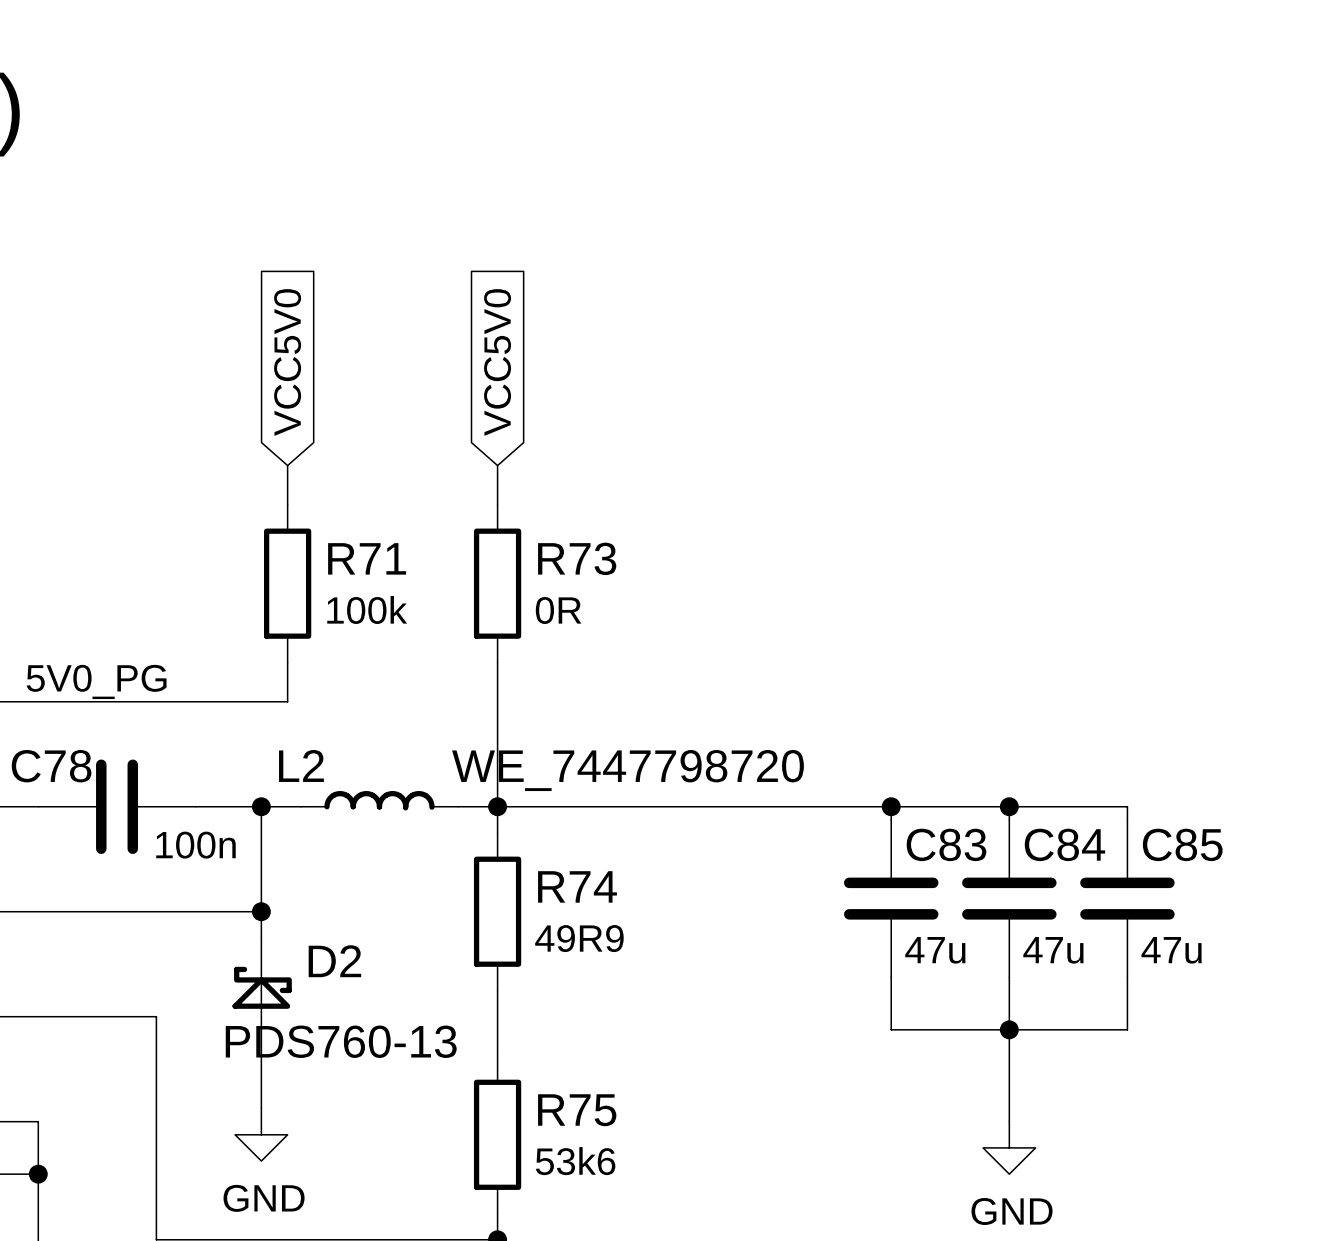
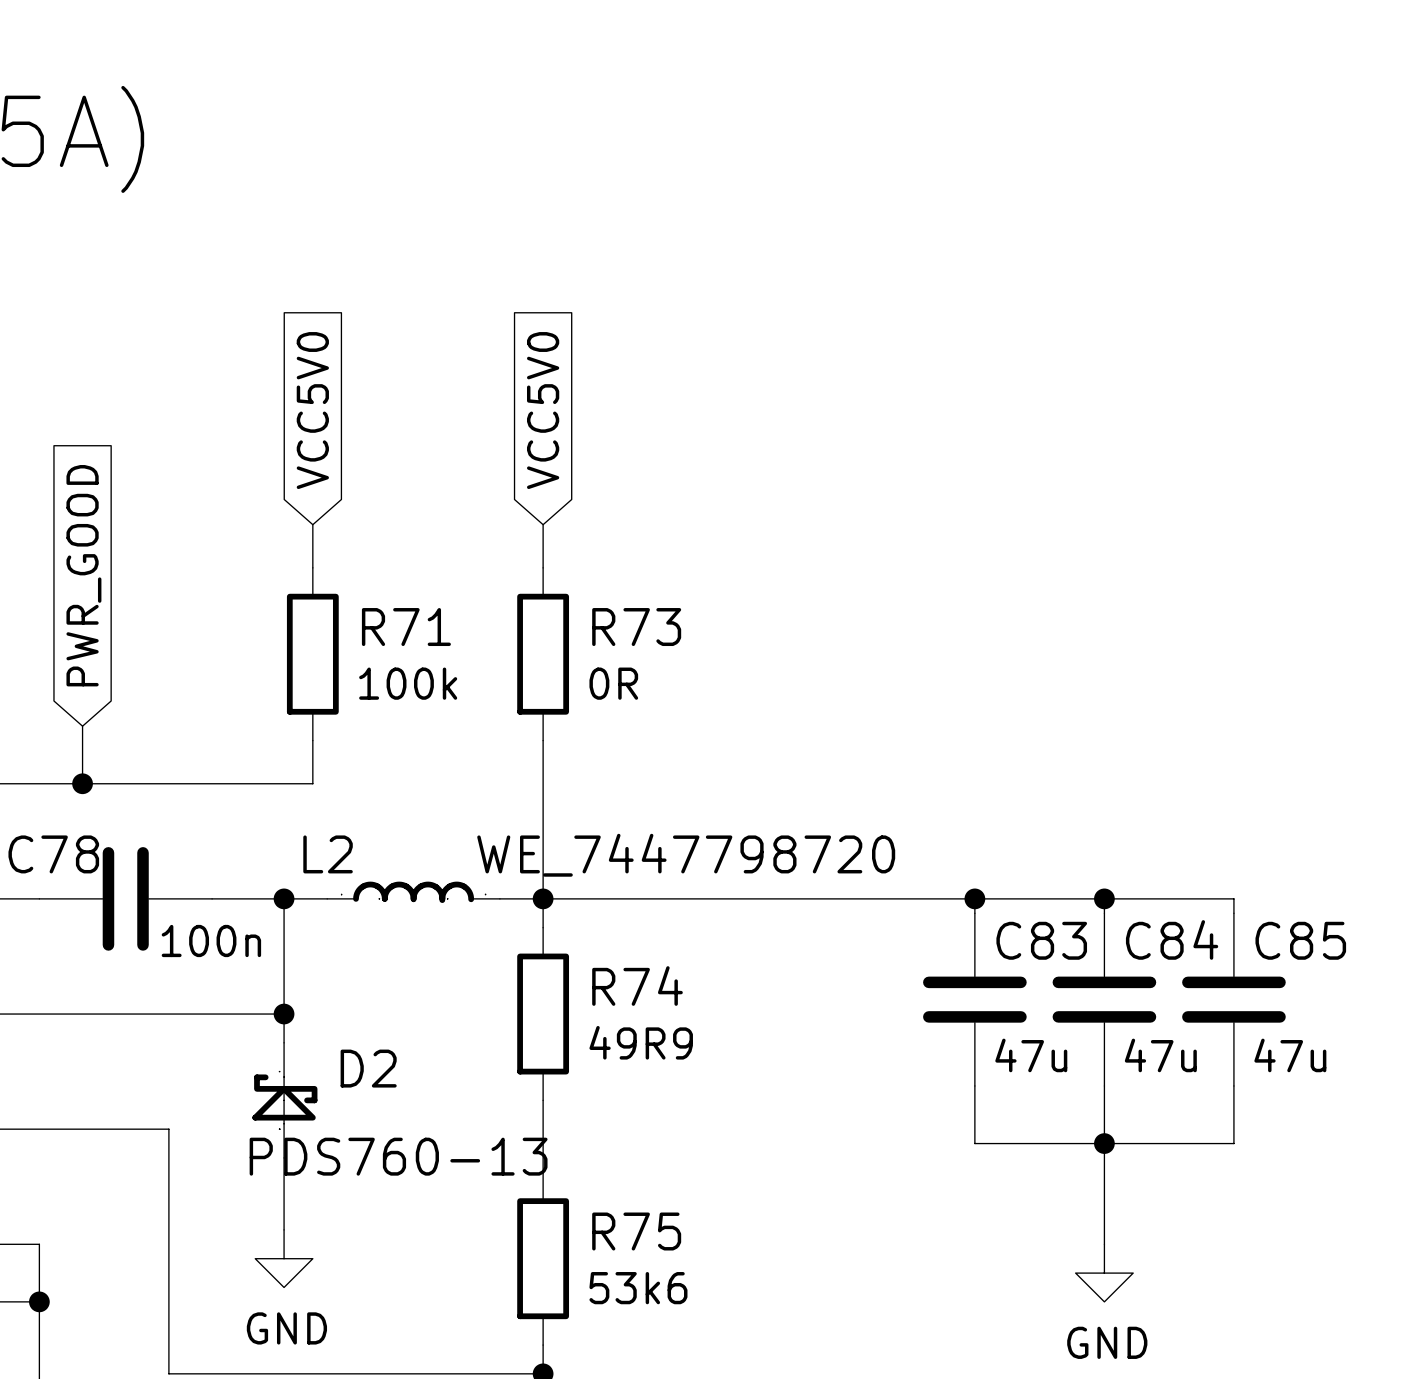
global label: none -> PWR_GOOD (83, 575)
wire: none -> (82, 726) (82, 783)
label: 5V0_PG (96, 681) -> none
junction: none -> (82, 783)

